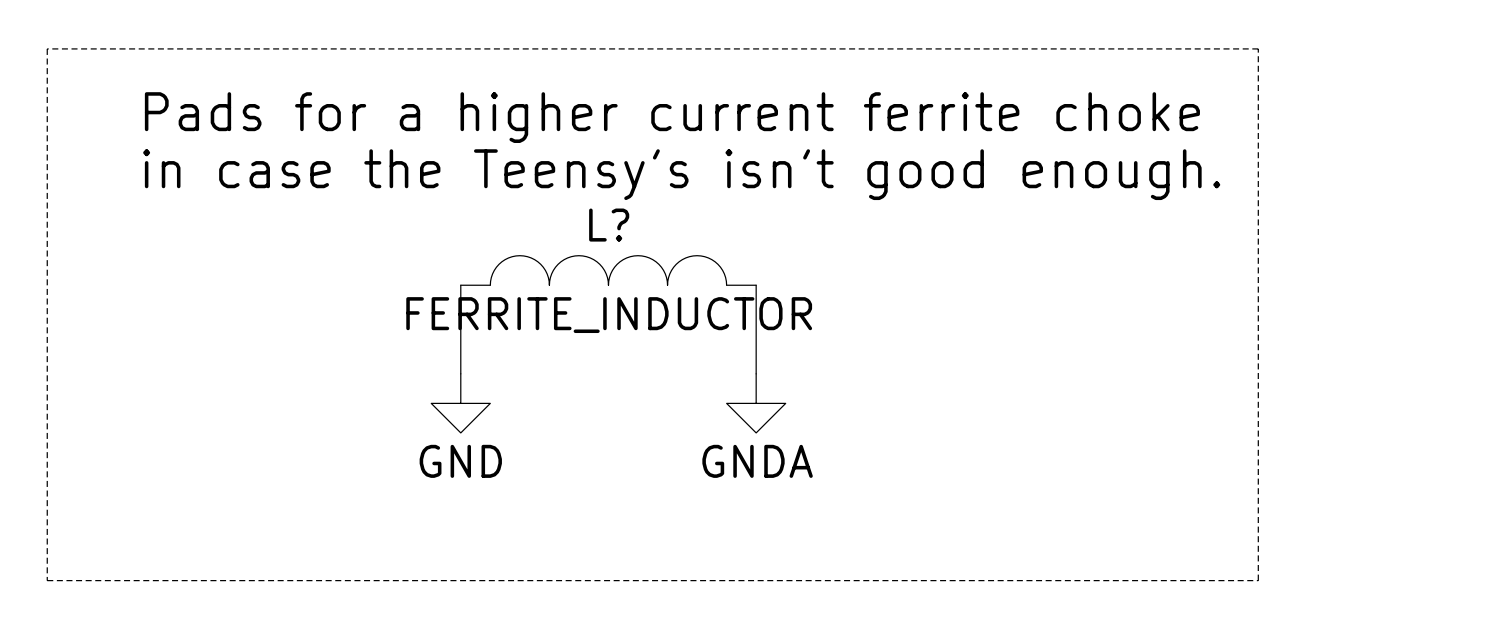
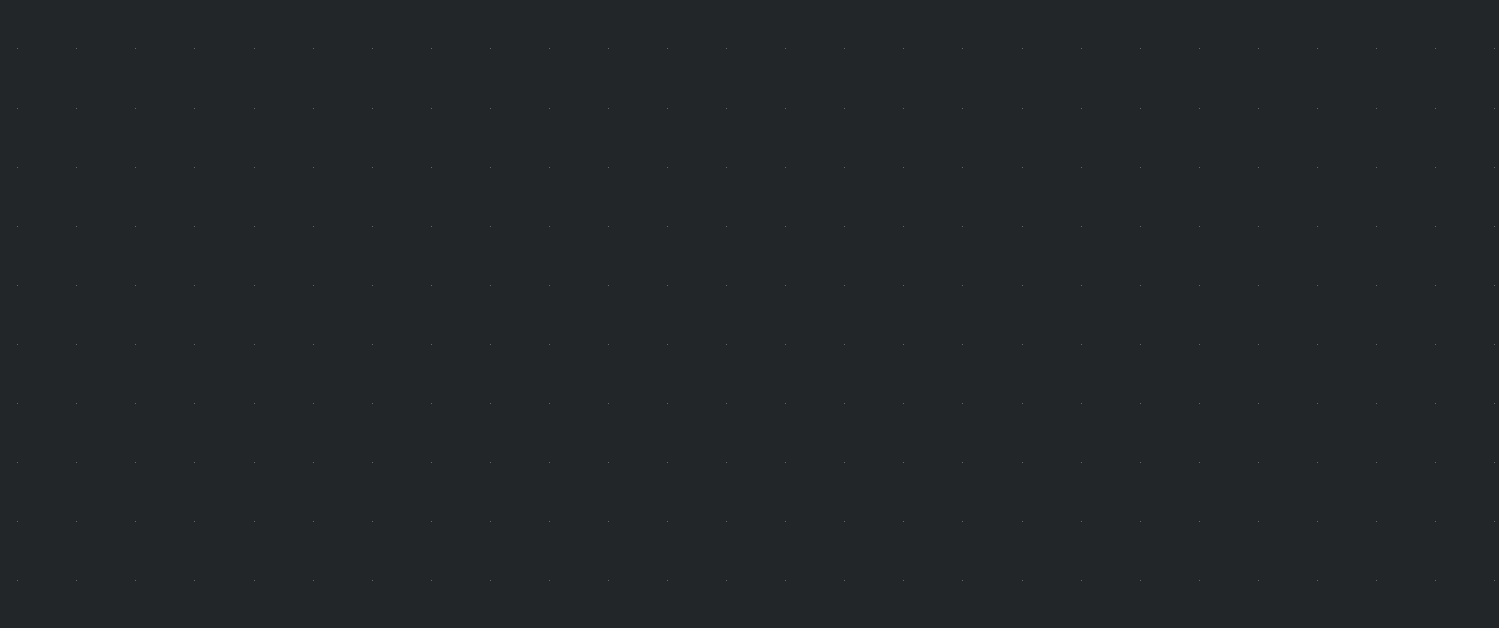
line: (47, 48) (1258, 48) (1258, 580) (47, 580) (47, 48) -> none
text: Pads for a higher current ferrite choke (672, 117) -> none
text: in case the Teensy's isn't good enough. (681, 174) -> none
L?: FERRITE_INDUCTOR (608, 270) -> none
wire: (460, 285) (460, 373) -> none
wire: (756, 285) (756, 373) -> none
power symbol: GND (460, 403) -> none
power symbol: GNDA (756, 403) -> none

